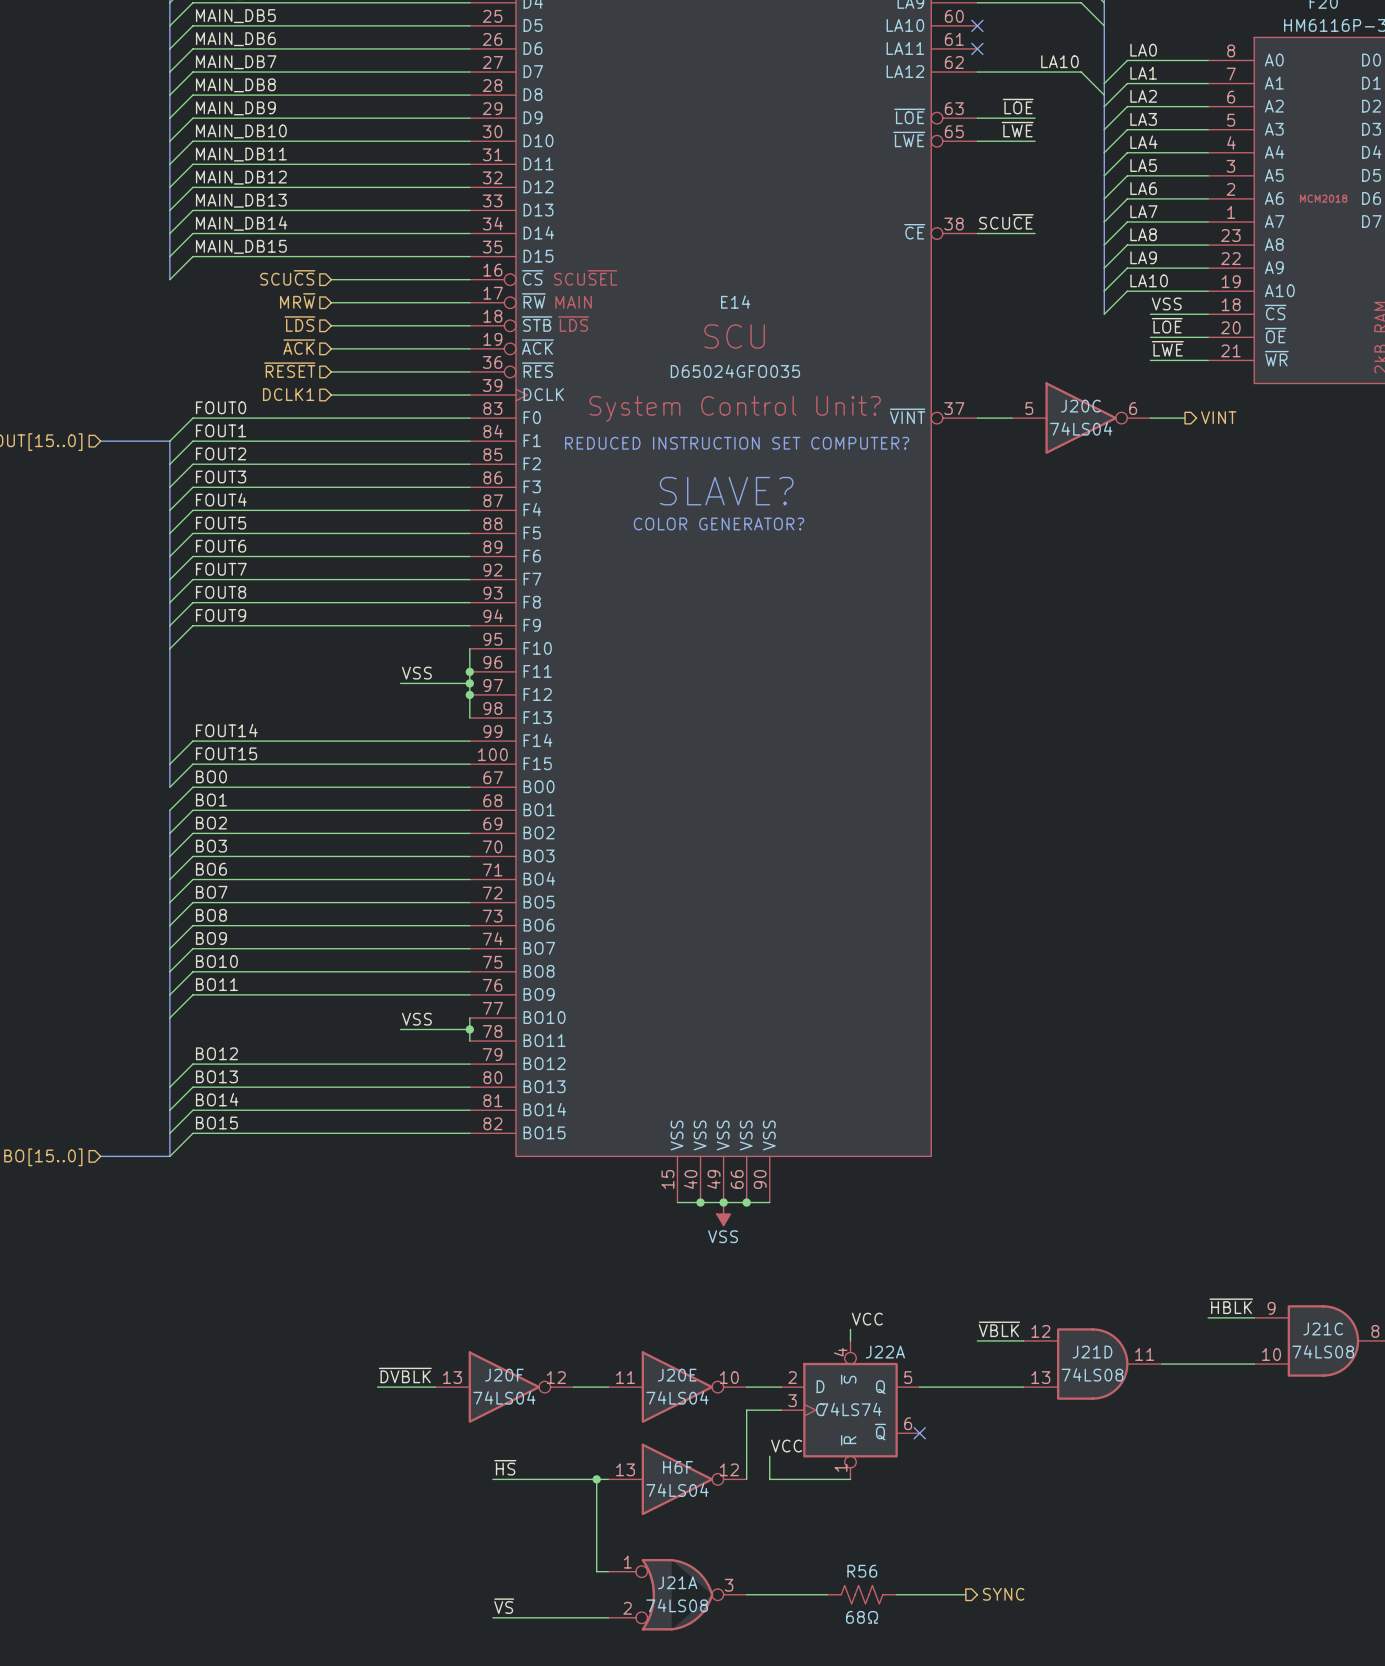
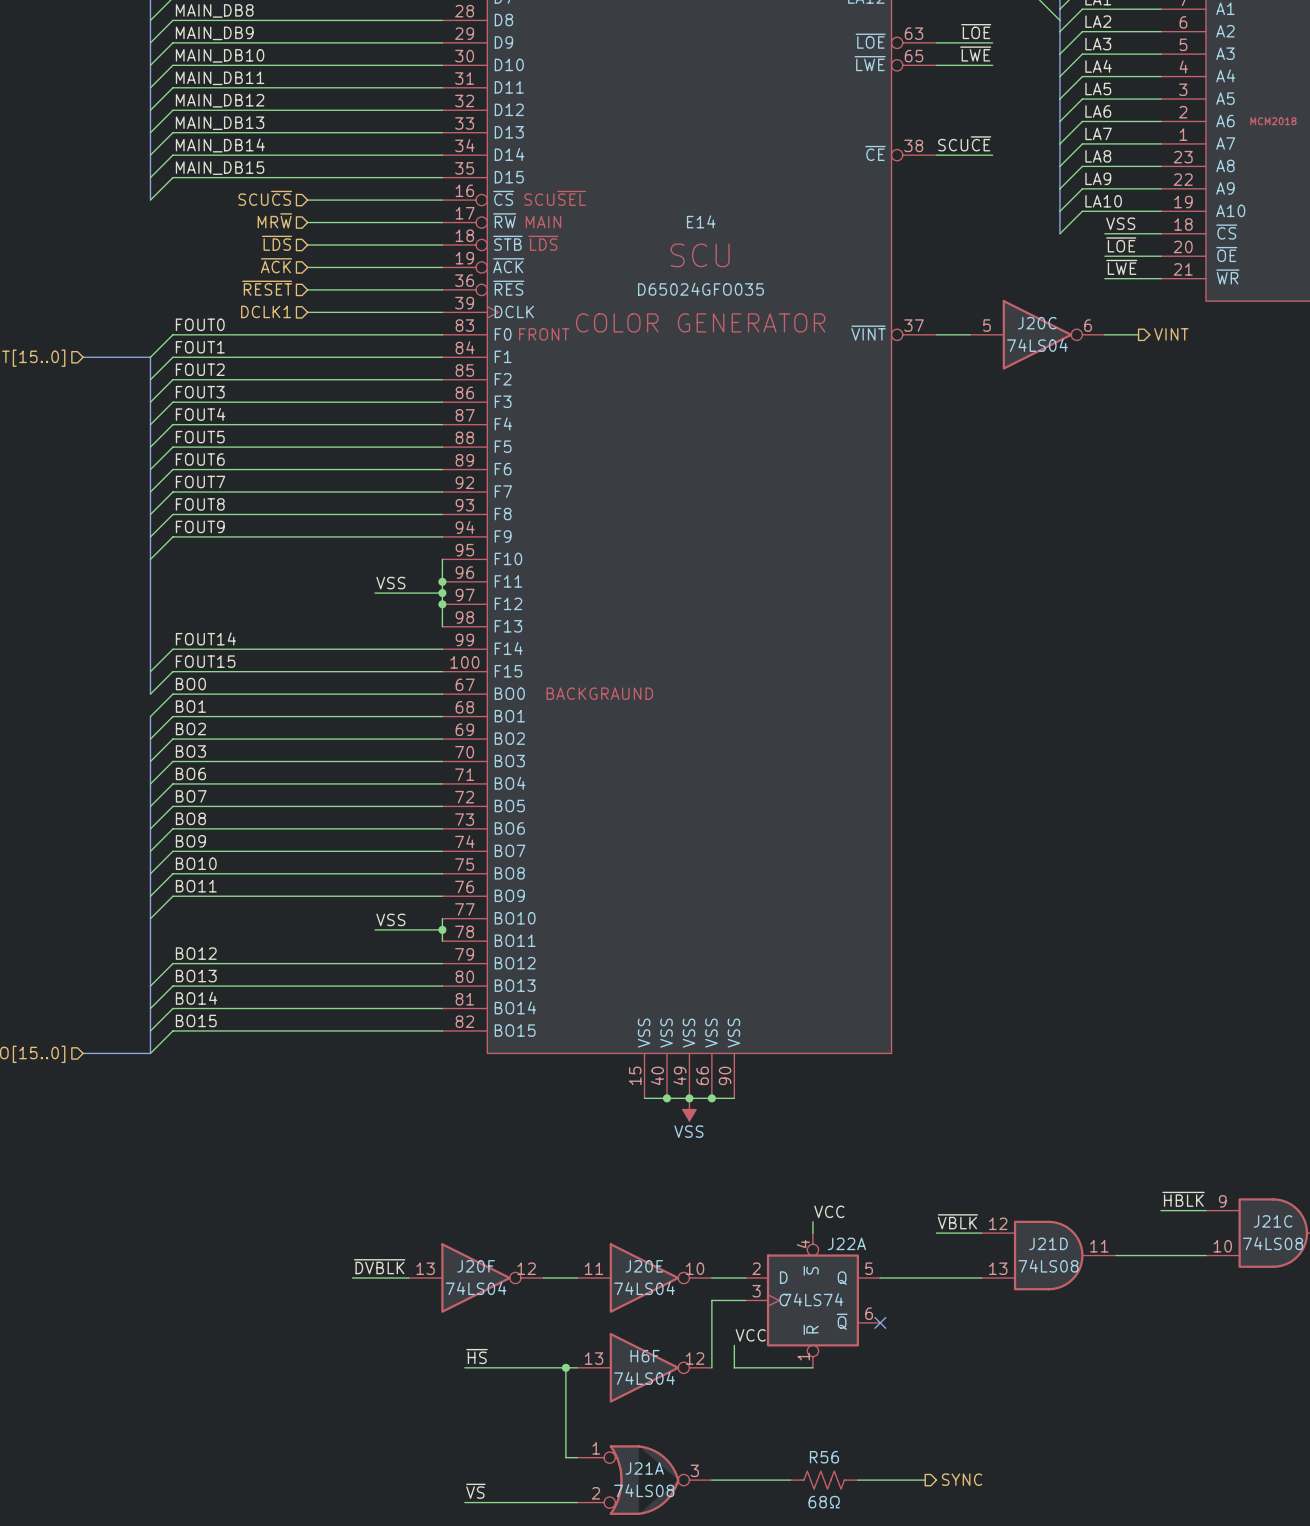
E14 text: System Control Unit? (735, 408) -> COLOR GENERATOR (700, 322)
E14 text: none -> FRONT (544, 334)
text: REDUCED INSTRUCTION SET COMPUTER? (737, 443) -> none
text: SLAVE? (726, 491) -> none
text: COLOR GENERATOR? (719, 524) -> none
E14 text: none -> BACKGRAUND (599, 693)

